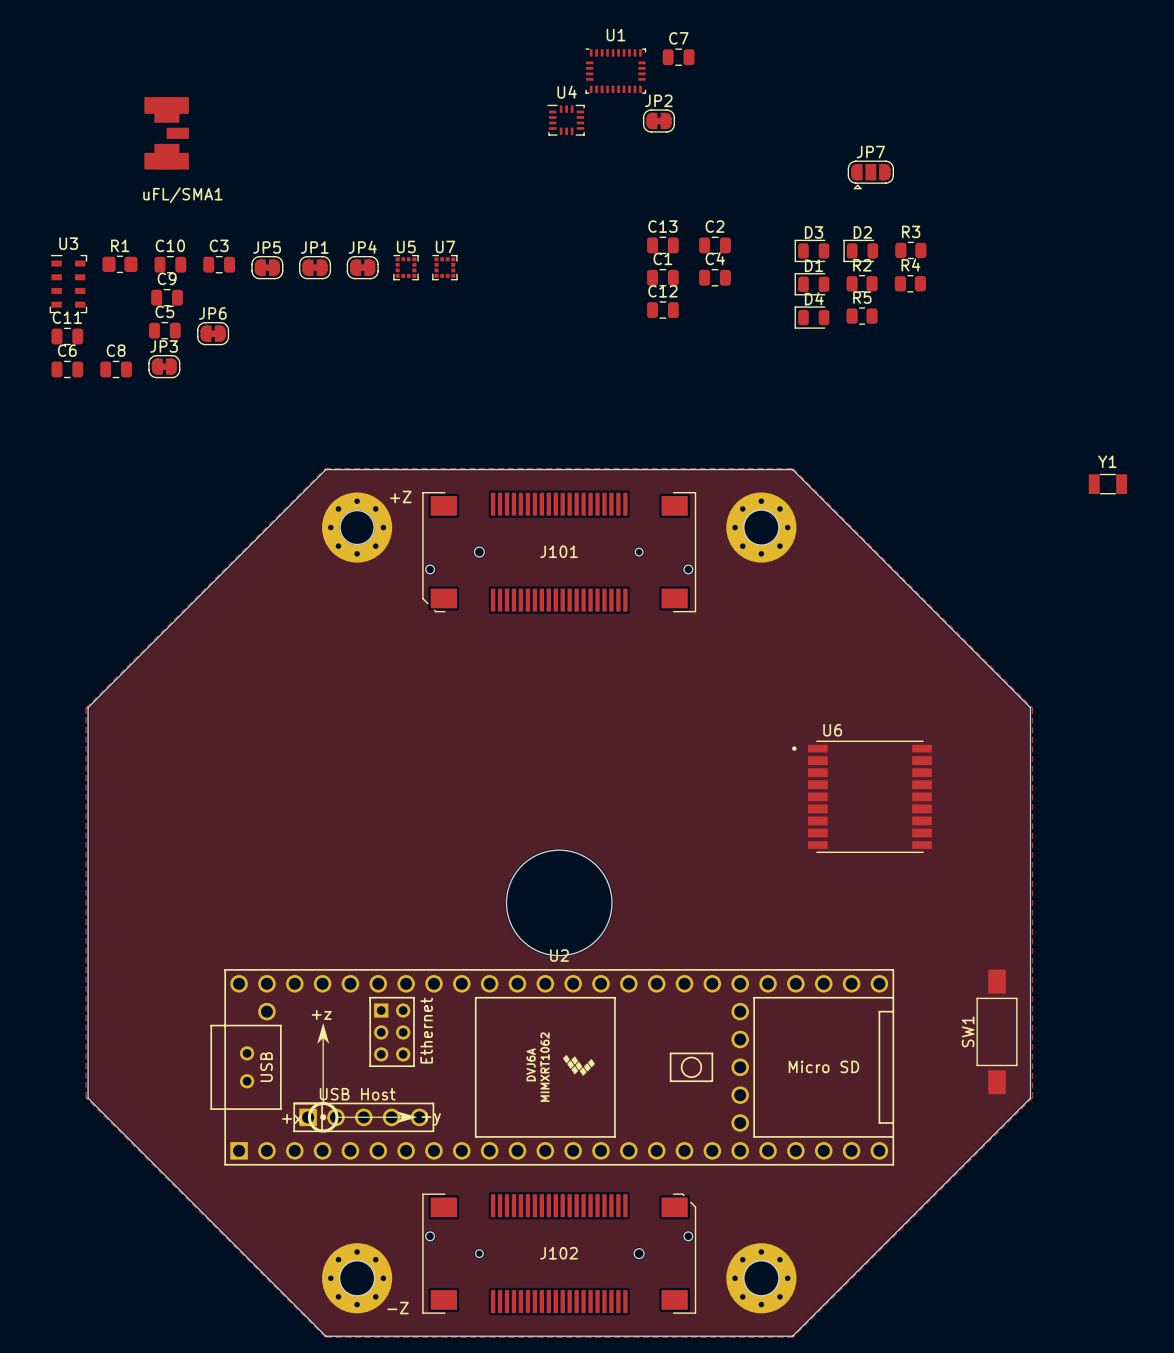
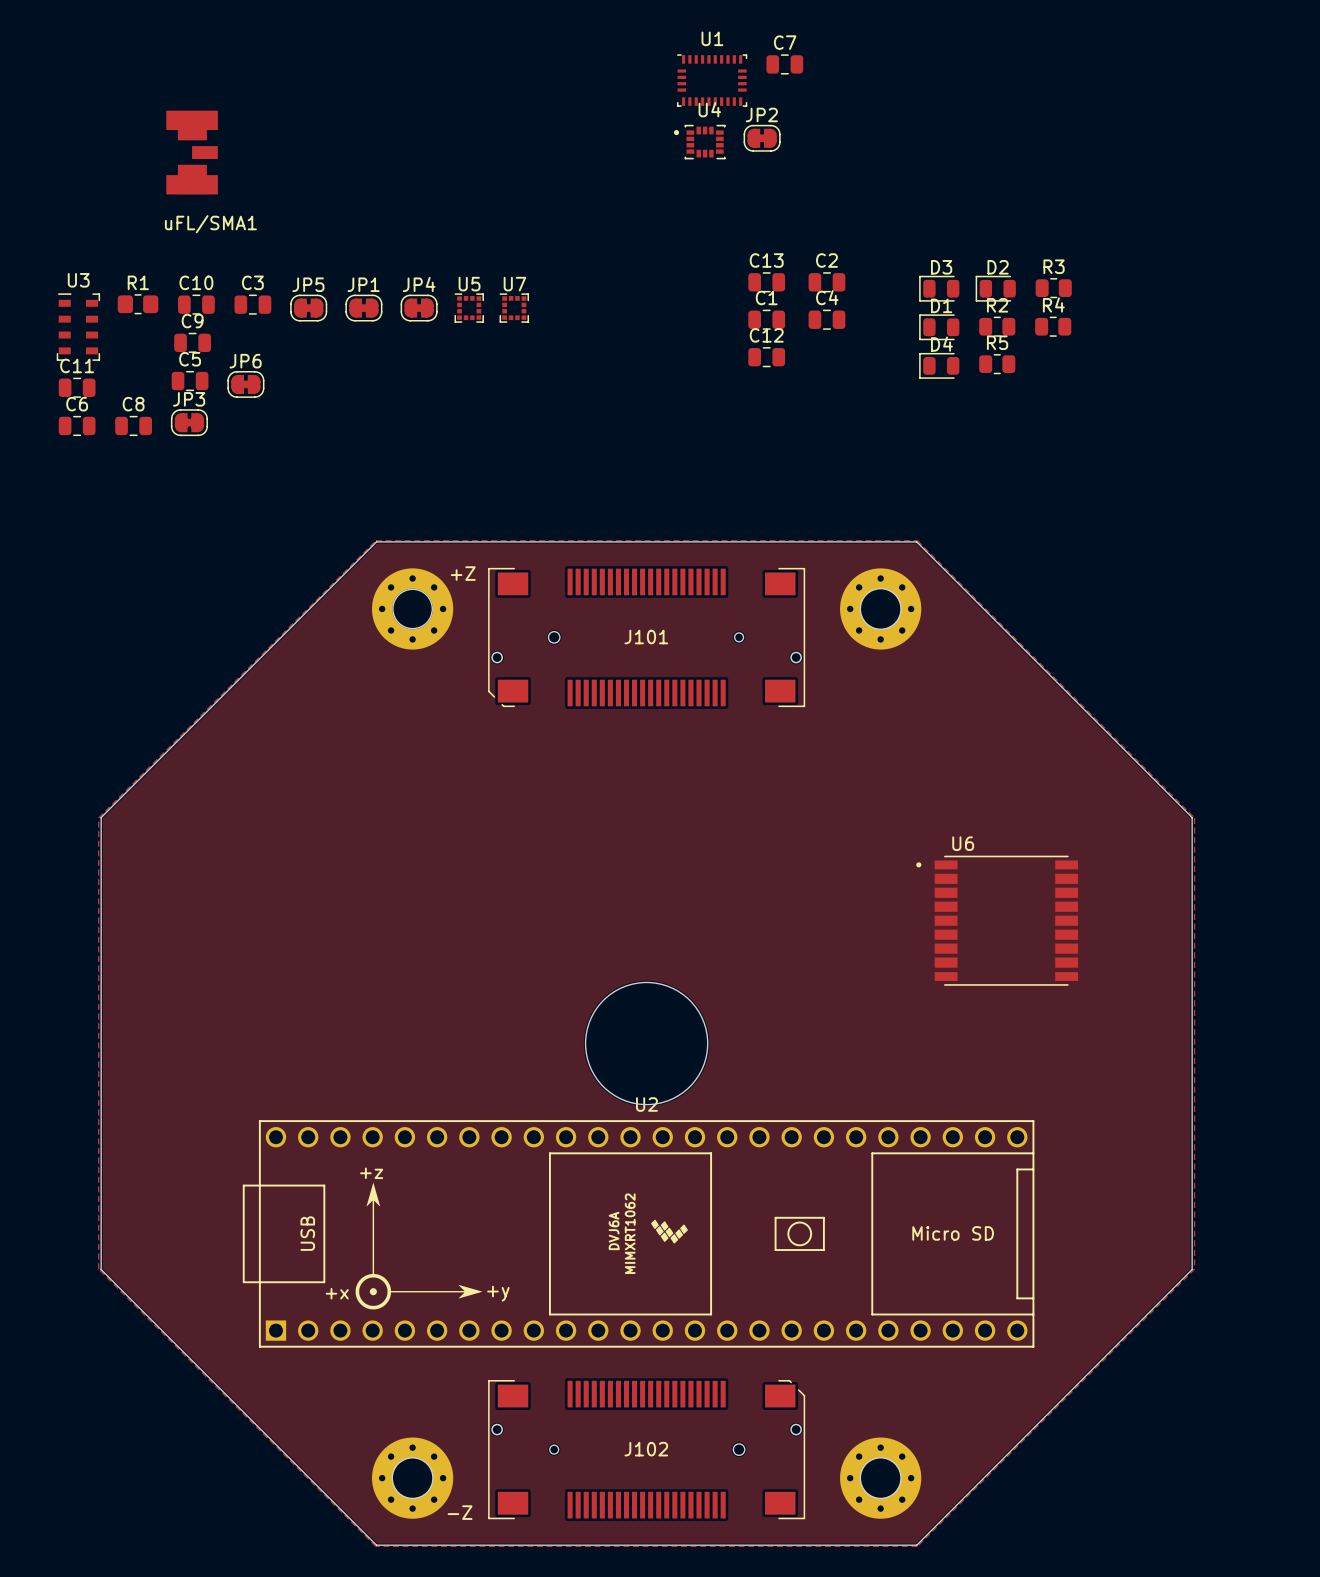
U4 footprint: [547, 104, 585, 136] -> [673, 124, 726, 160]
JP7: (870, 174) -> none
Y1: (1107, 484) -> none
U2 footprint: [210, 969, 895, 1166] -> [242, 1120, 1035, 1348]
SW1: (997, 1031) -> none

